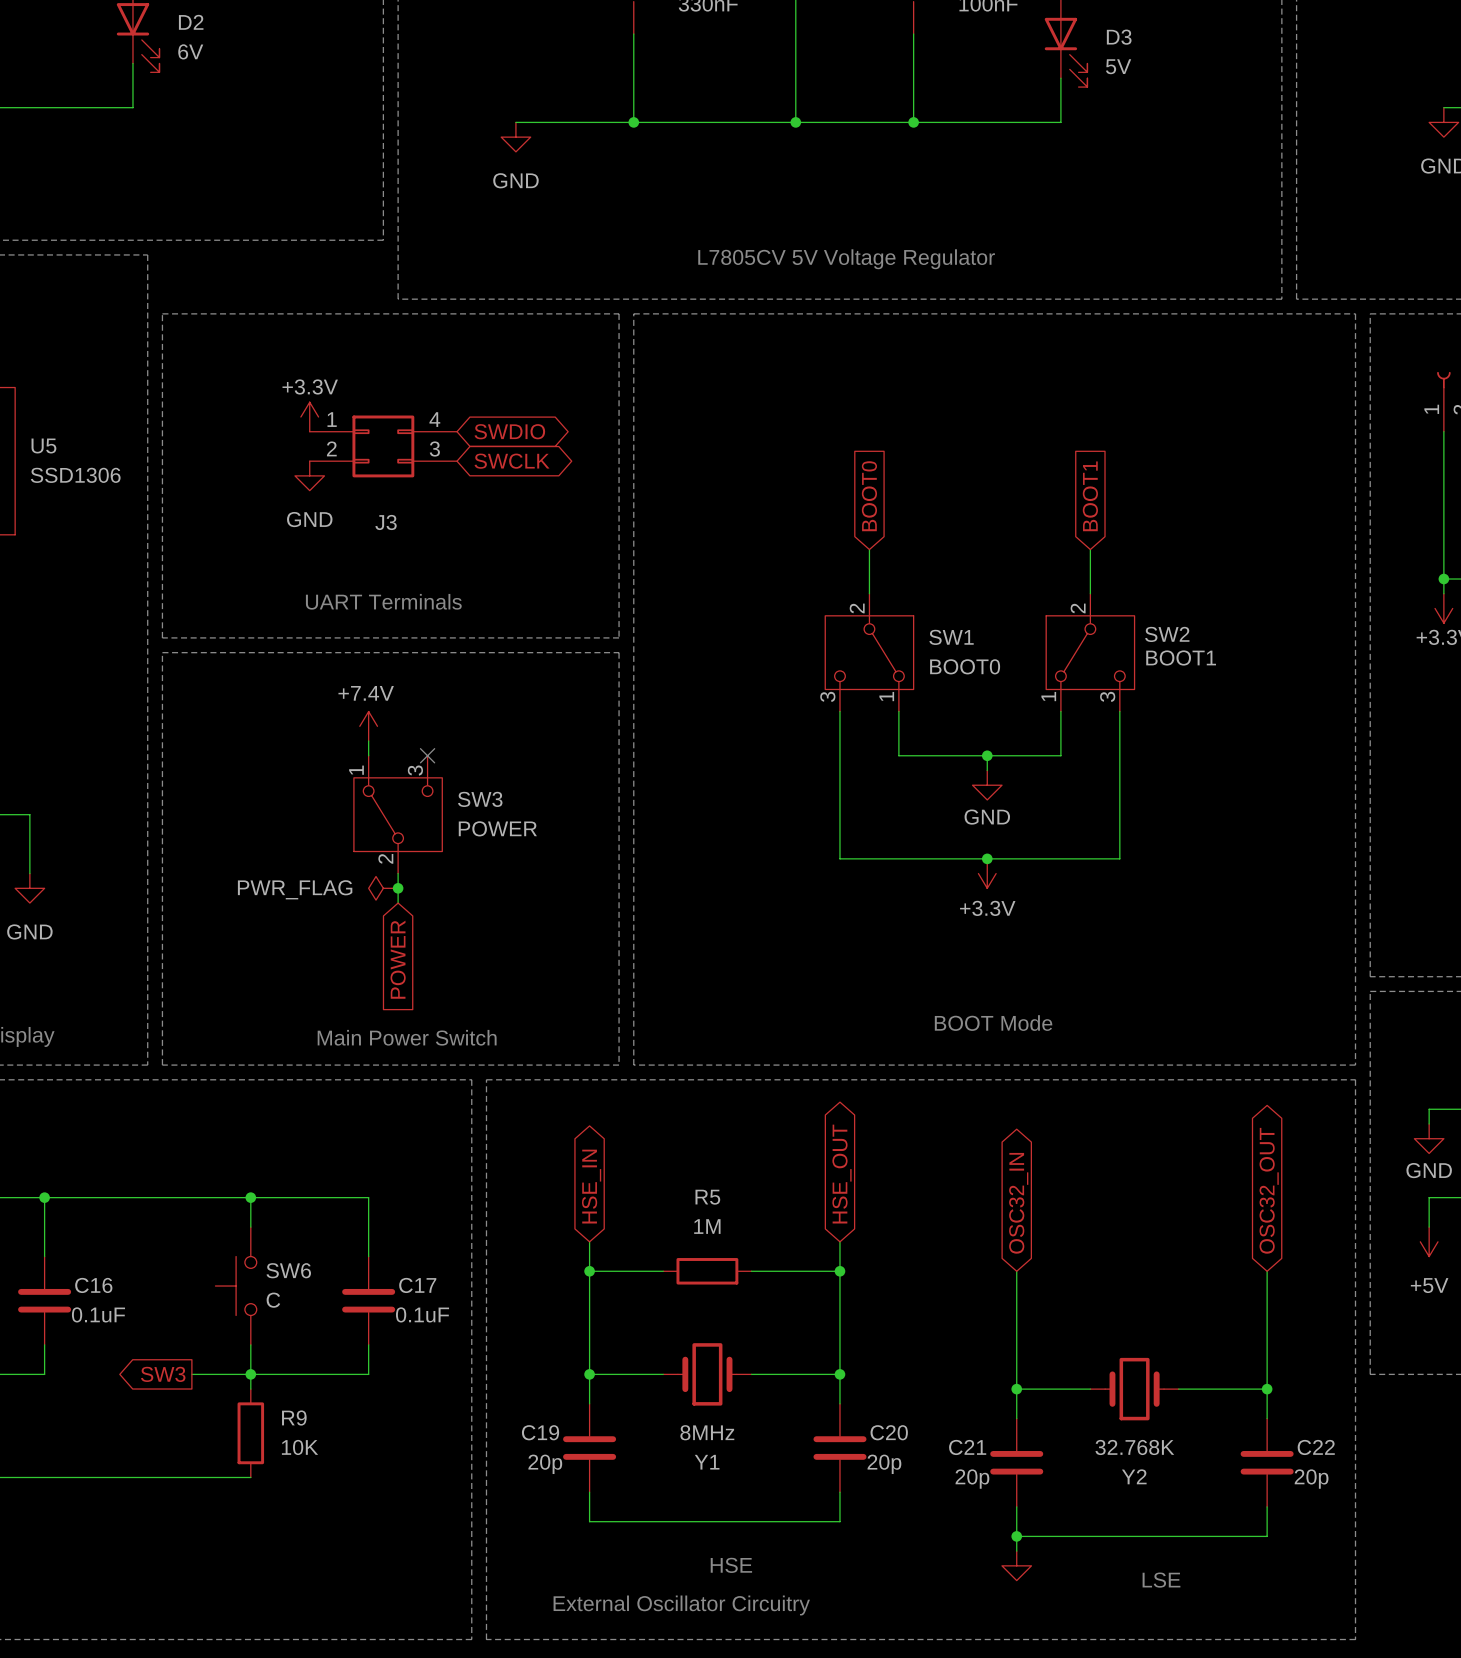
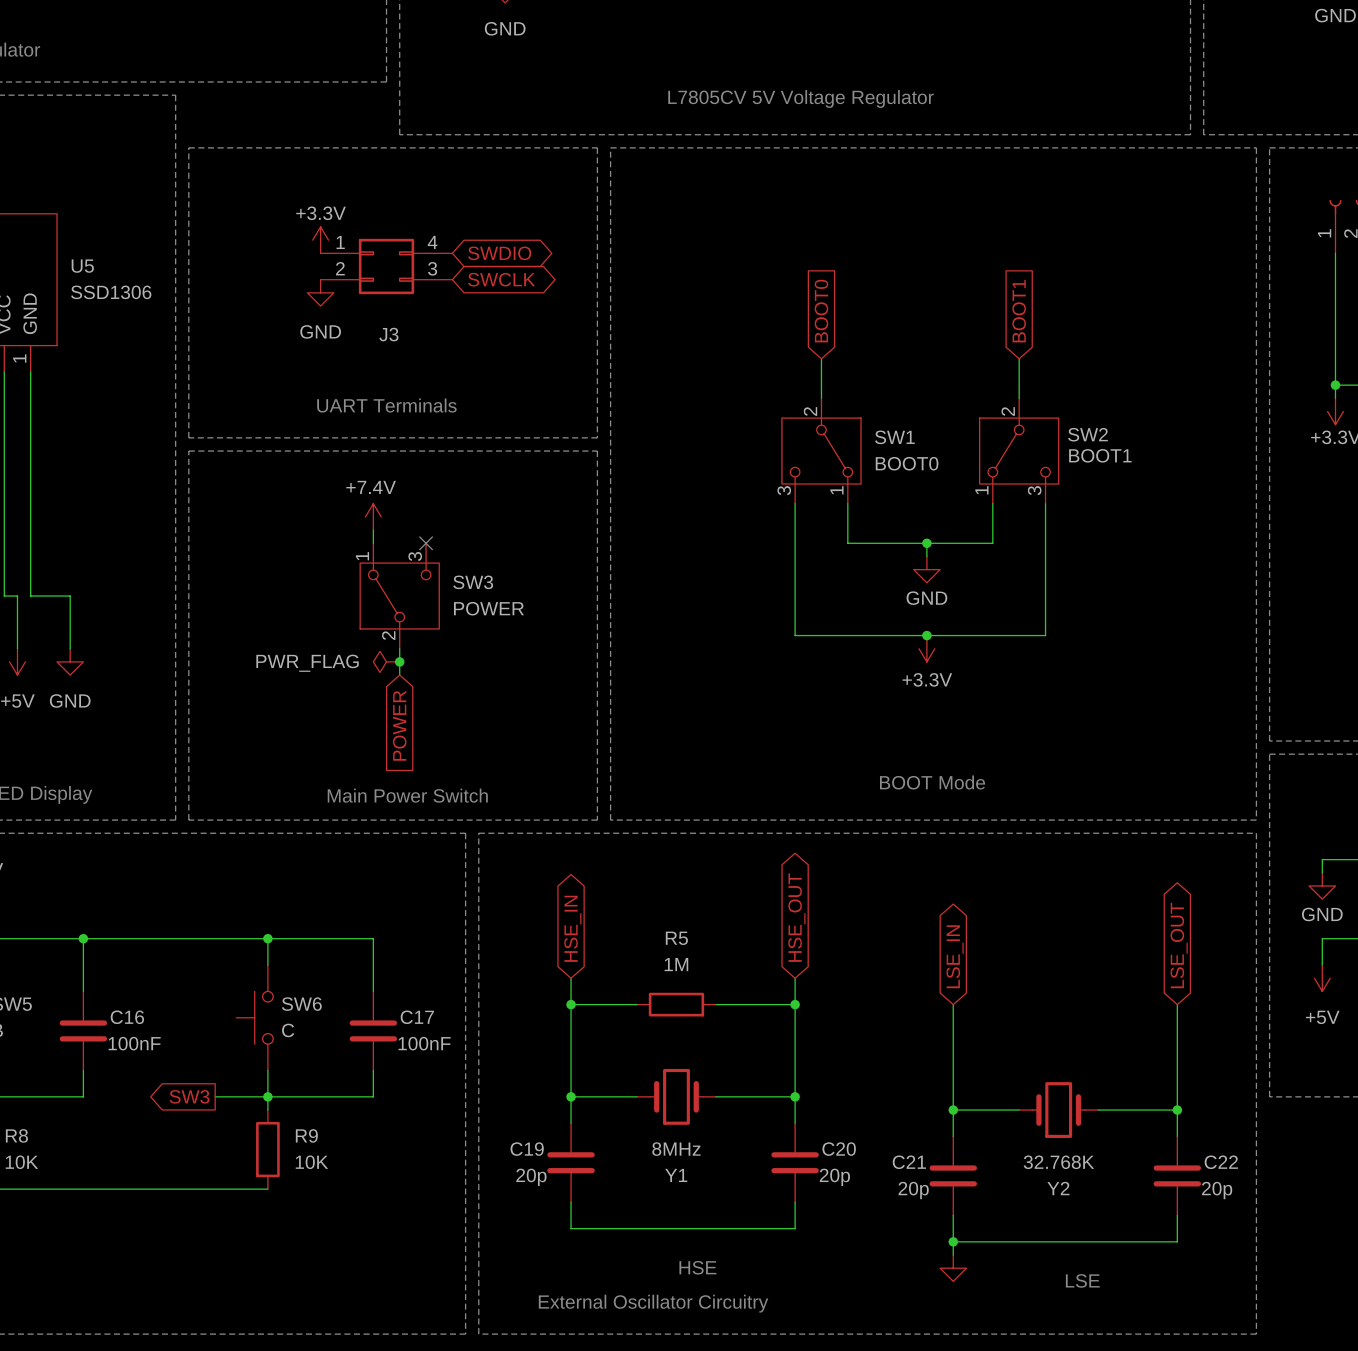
global label: OSC32_OUT (1269, 1190) -> LSE_OUT (1179, 945)
global label: OSC32_IN (1018, 1203) -> LSE_IN (955, 956)
C16 value: 0.1uF (98, 1314) -> 100nF (134, 1043)
C17 value: 0.1uF (422, 1314) -> 100nF (424, 1043)

